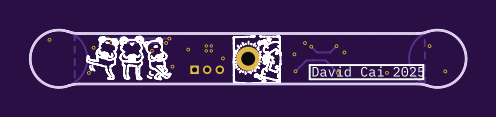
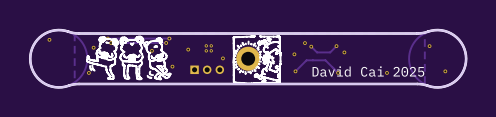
line: (423, 65) (309, 65) (309, 79) (423, 79) (423, 65) -> none

